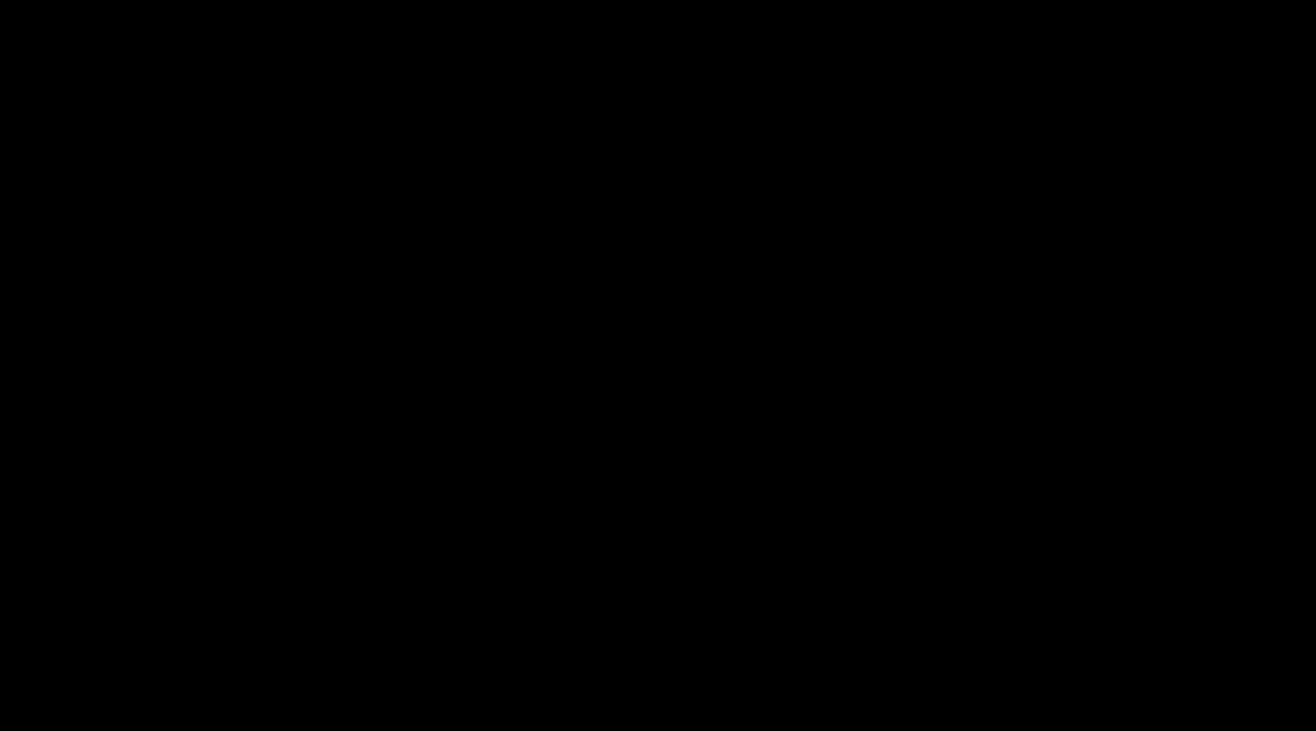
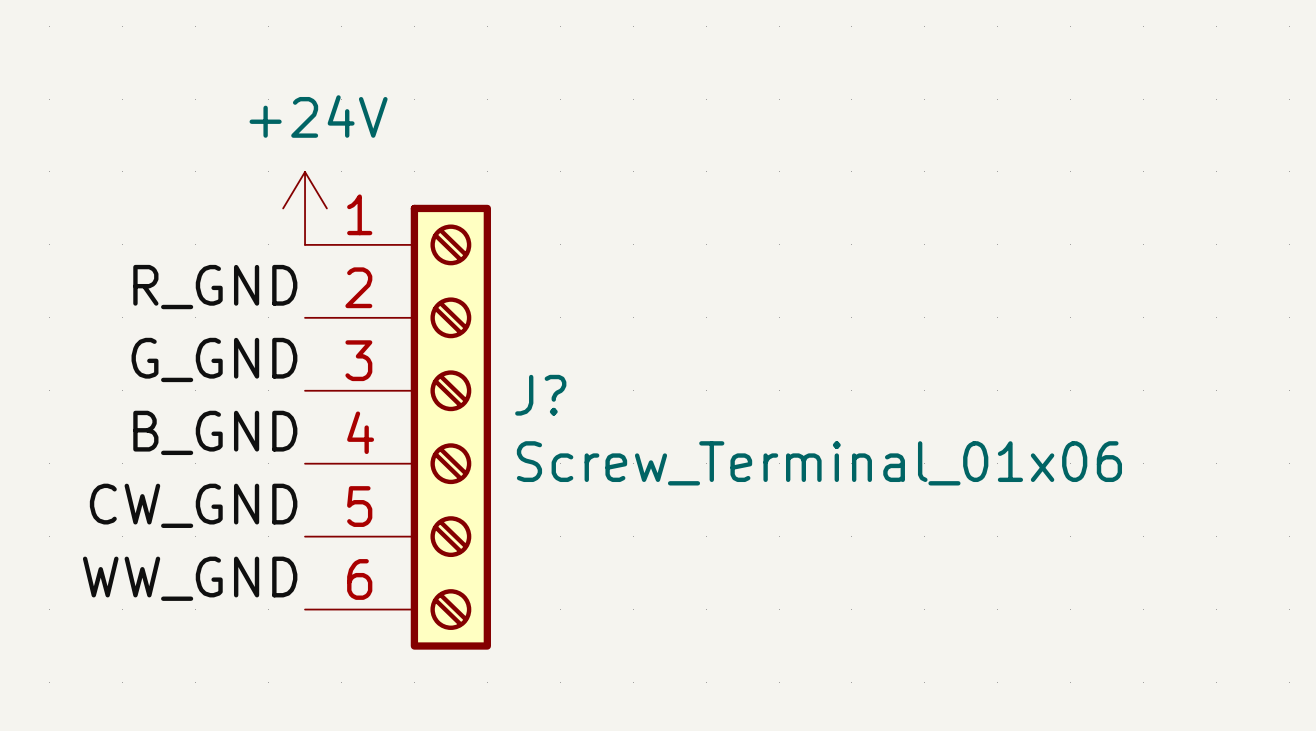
power symbol: none -> +24V (305, 208)
label: none -> R_GND (215, 287)
label: none -> G_GND (214, 359)
J?: none -> Screw_Terminal_01x06 (398, 427)
label: none -> B_GND (215, 432)
label: none -> CW_GND (193, 505)
label: none -> WW_GND (190, 578)

